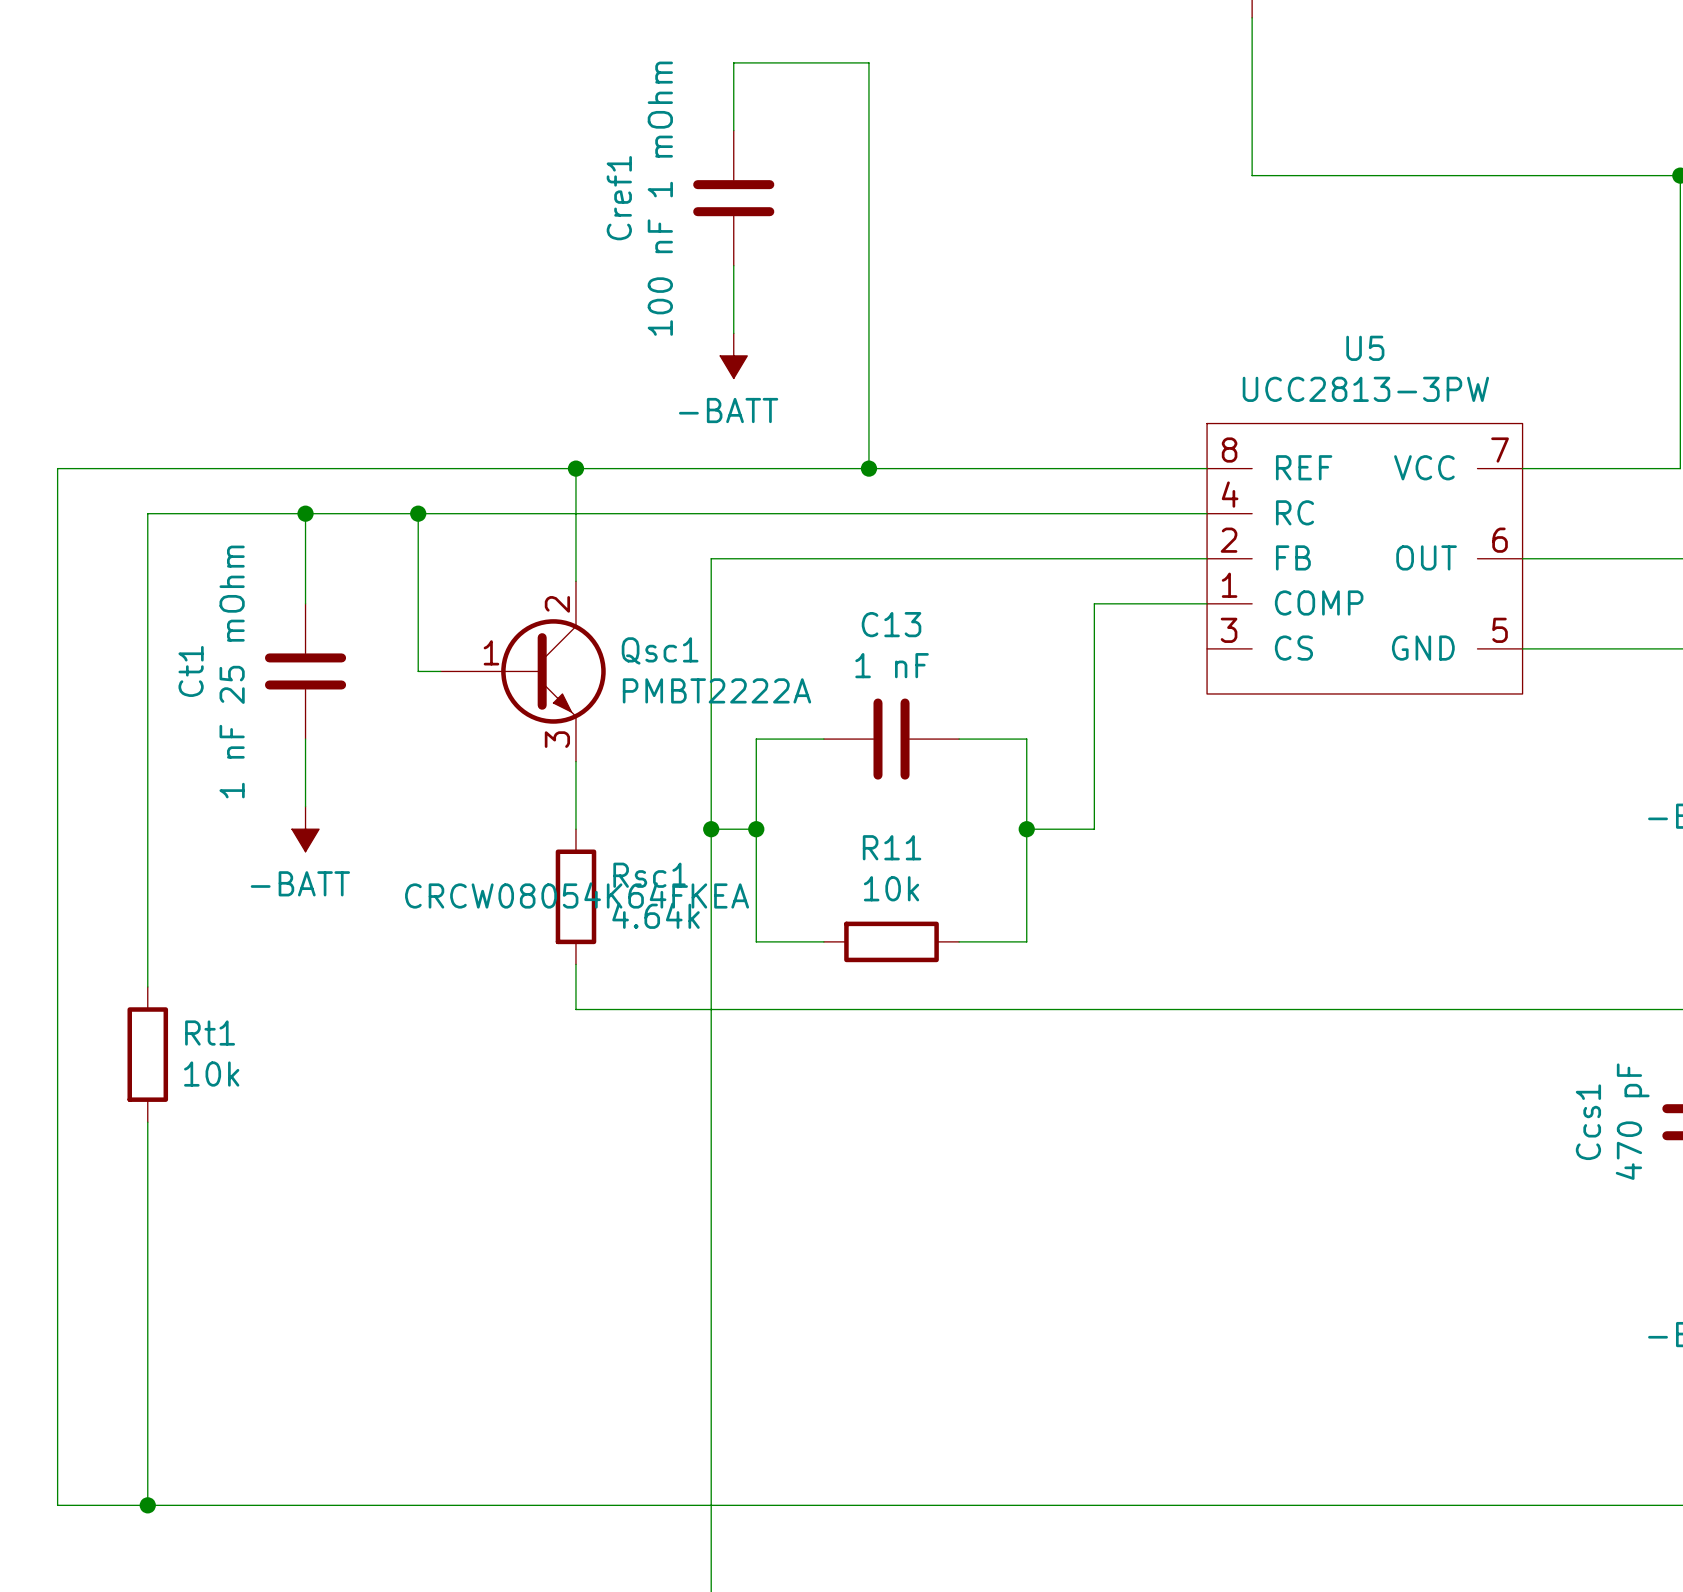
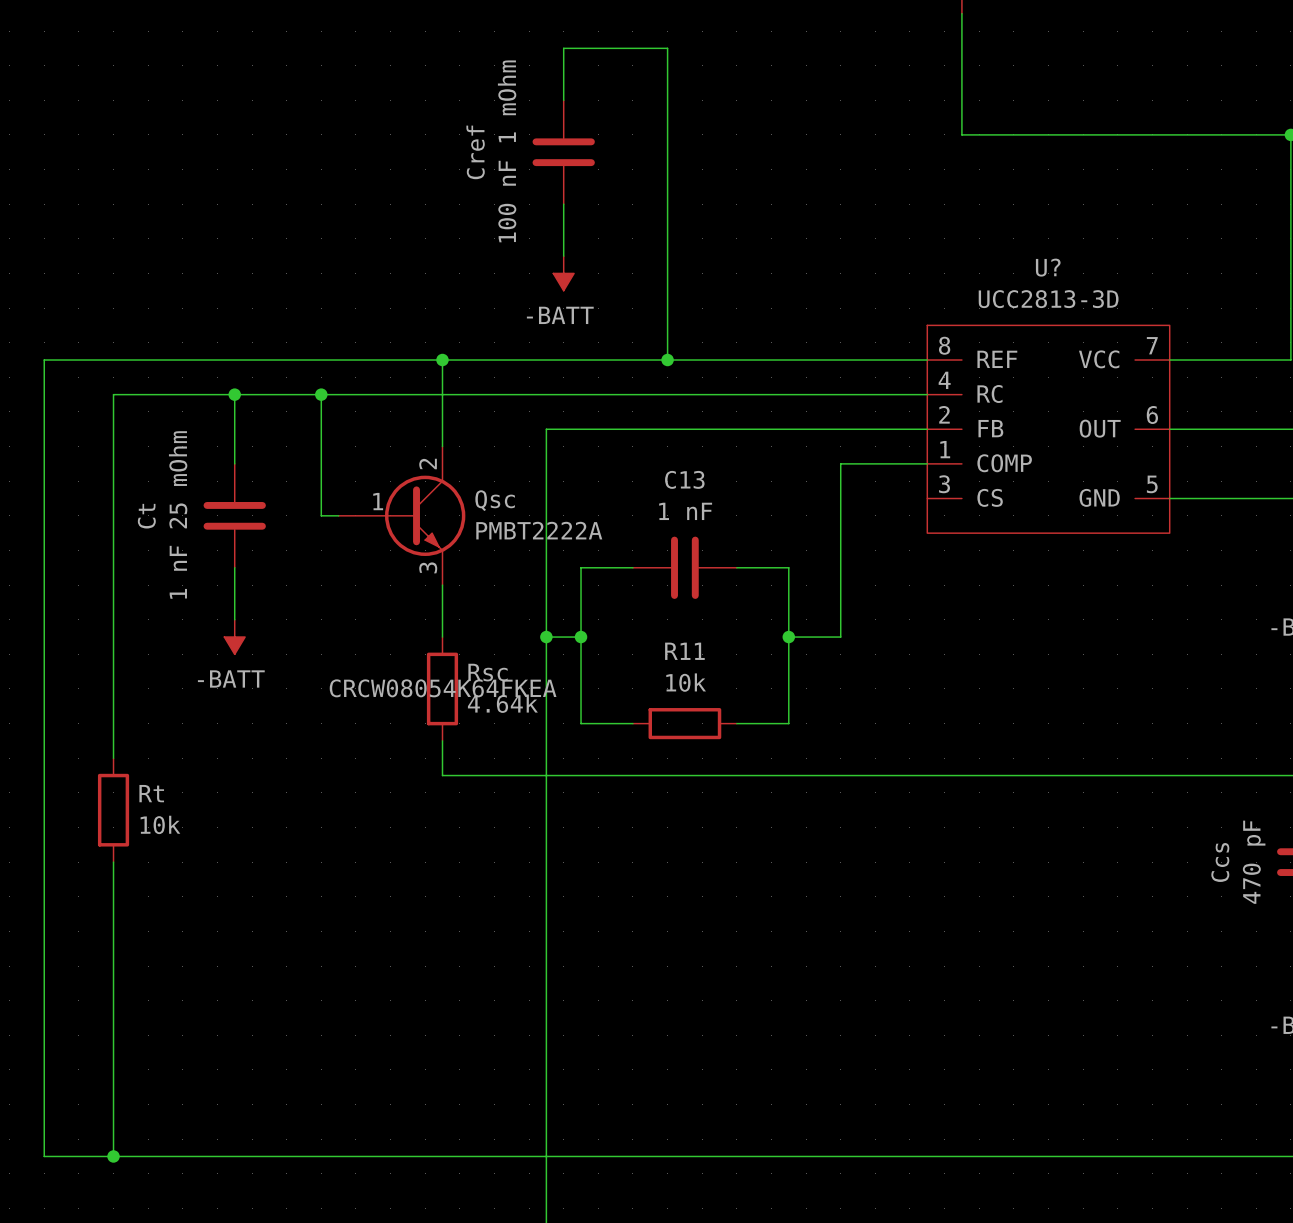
Cref1 name: Cref1 (619, 198) -> Cref (475, 152)
U5 name: U5 (1365, 348) -> U? (1048, 267)
U5 value: UCC2813-3PW (1365, 389) -> UCC2813-3D (1048, 299)
Qsc1 name: Qsc1 (660, 650) -> Qsc (495, 500)
Ct1 name: Ct1 (191, 671) -> Ct (146, 516)
Rsc1 name: Rsc1 (650, 875) -> Rsc (488, 672)
Rt1 name: Rt1 (210, 1033) -> Rt (151, 793)
Ccs1 name: Ccs1 (1588, 1122) -> Ccs (1220, 862)

